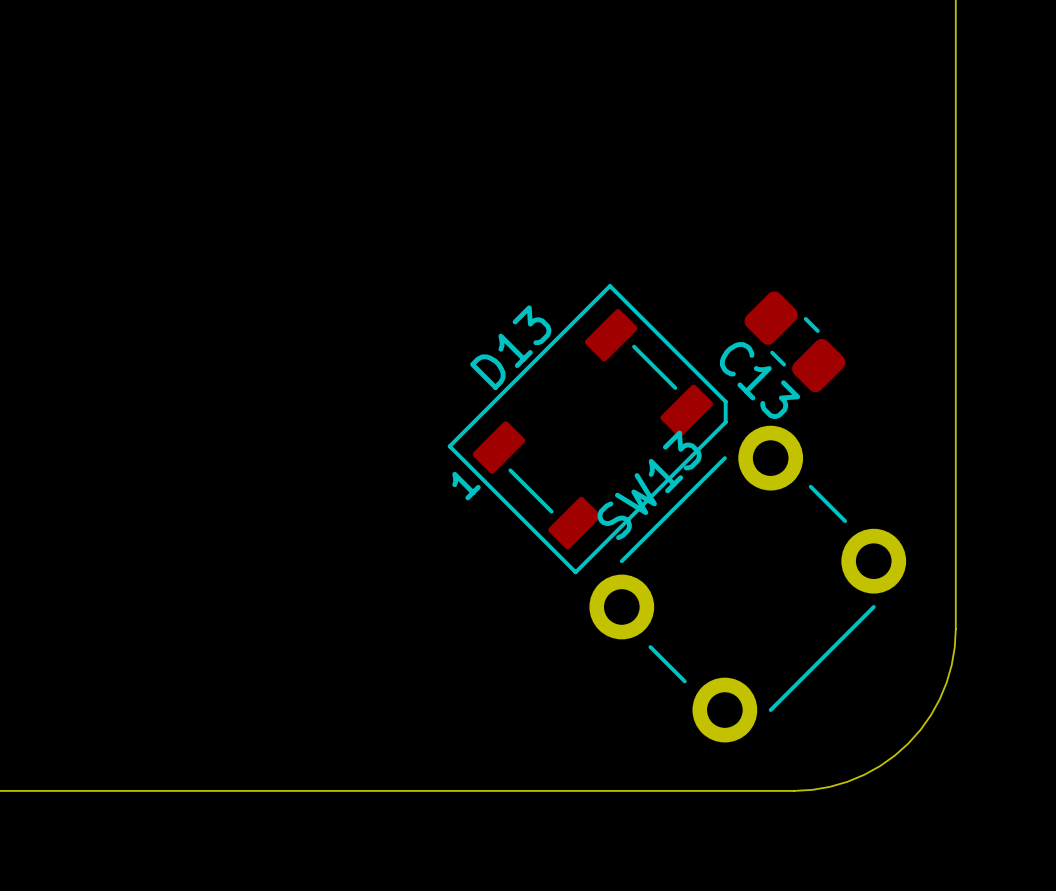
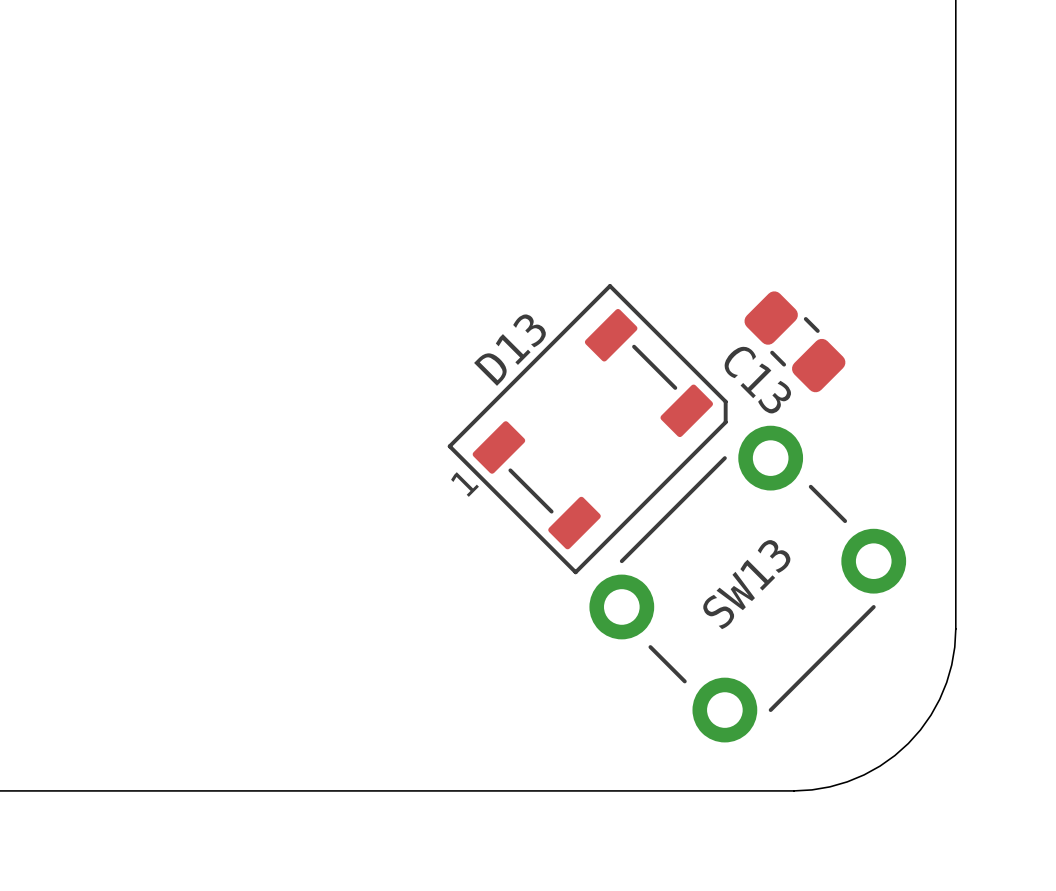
SW13 name position: SW13 (649, 485) -> SW13 (746, 584)

